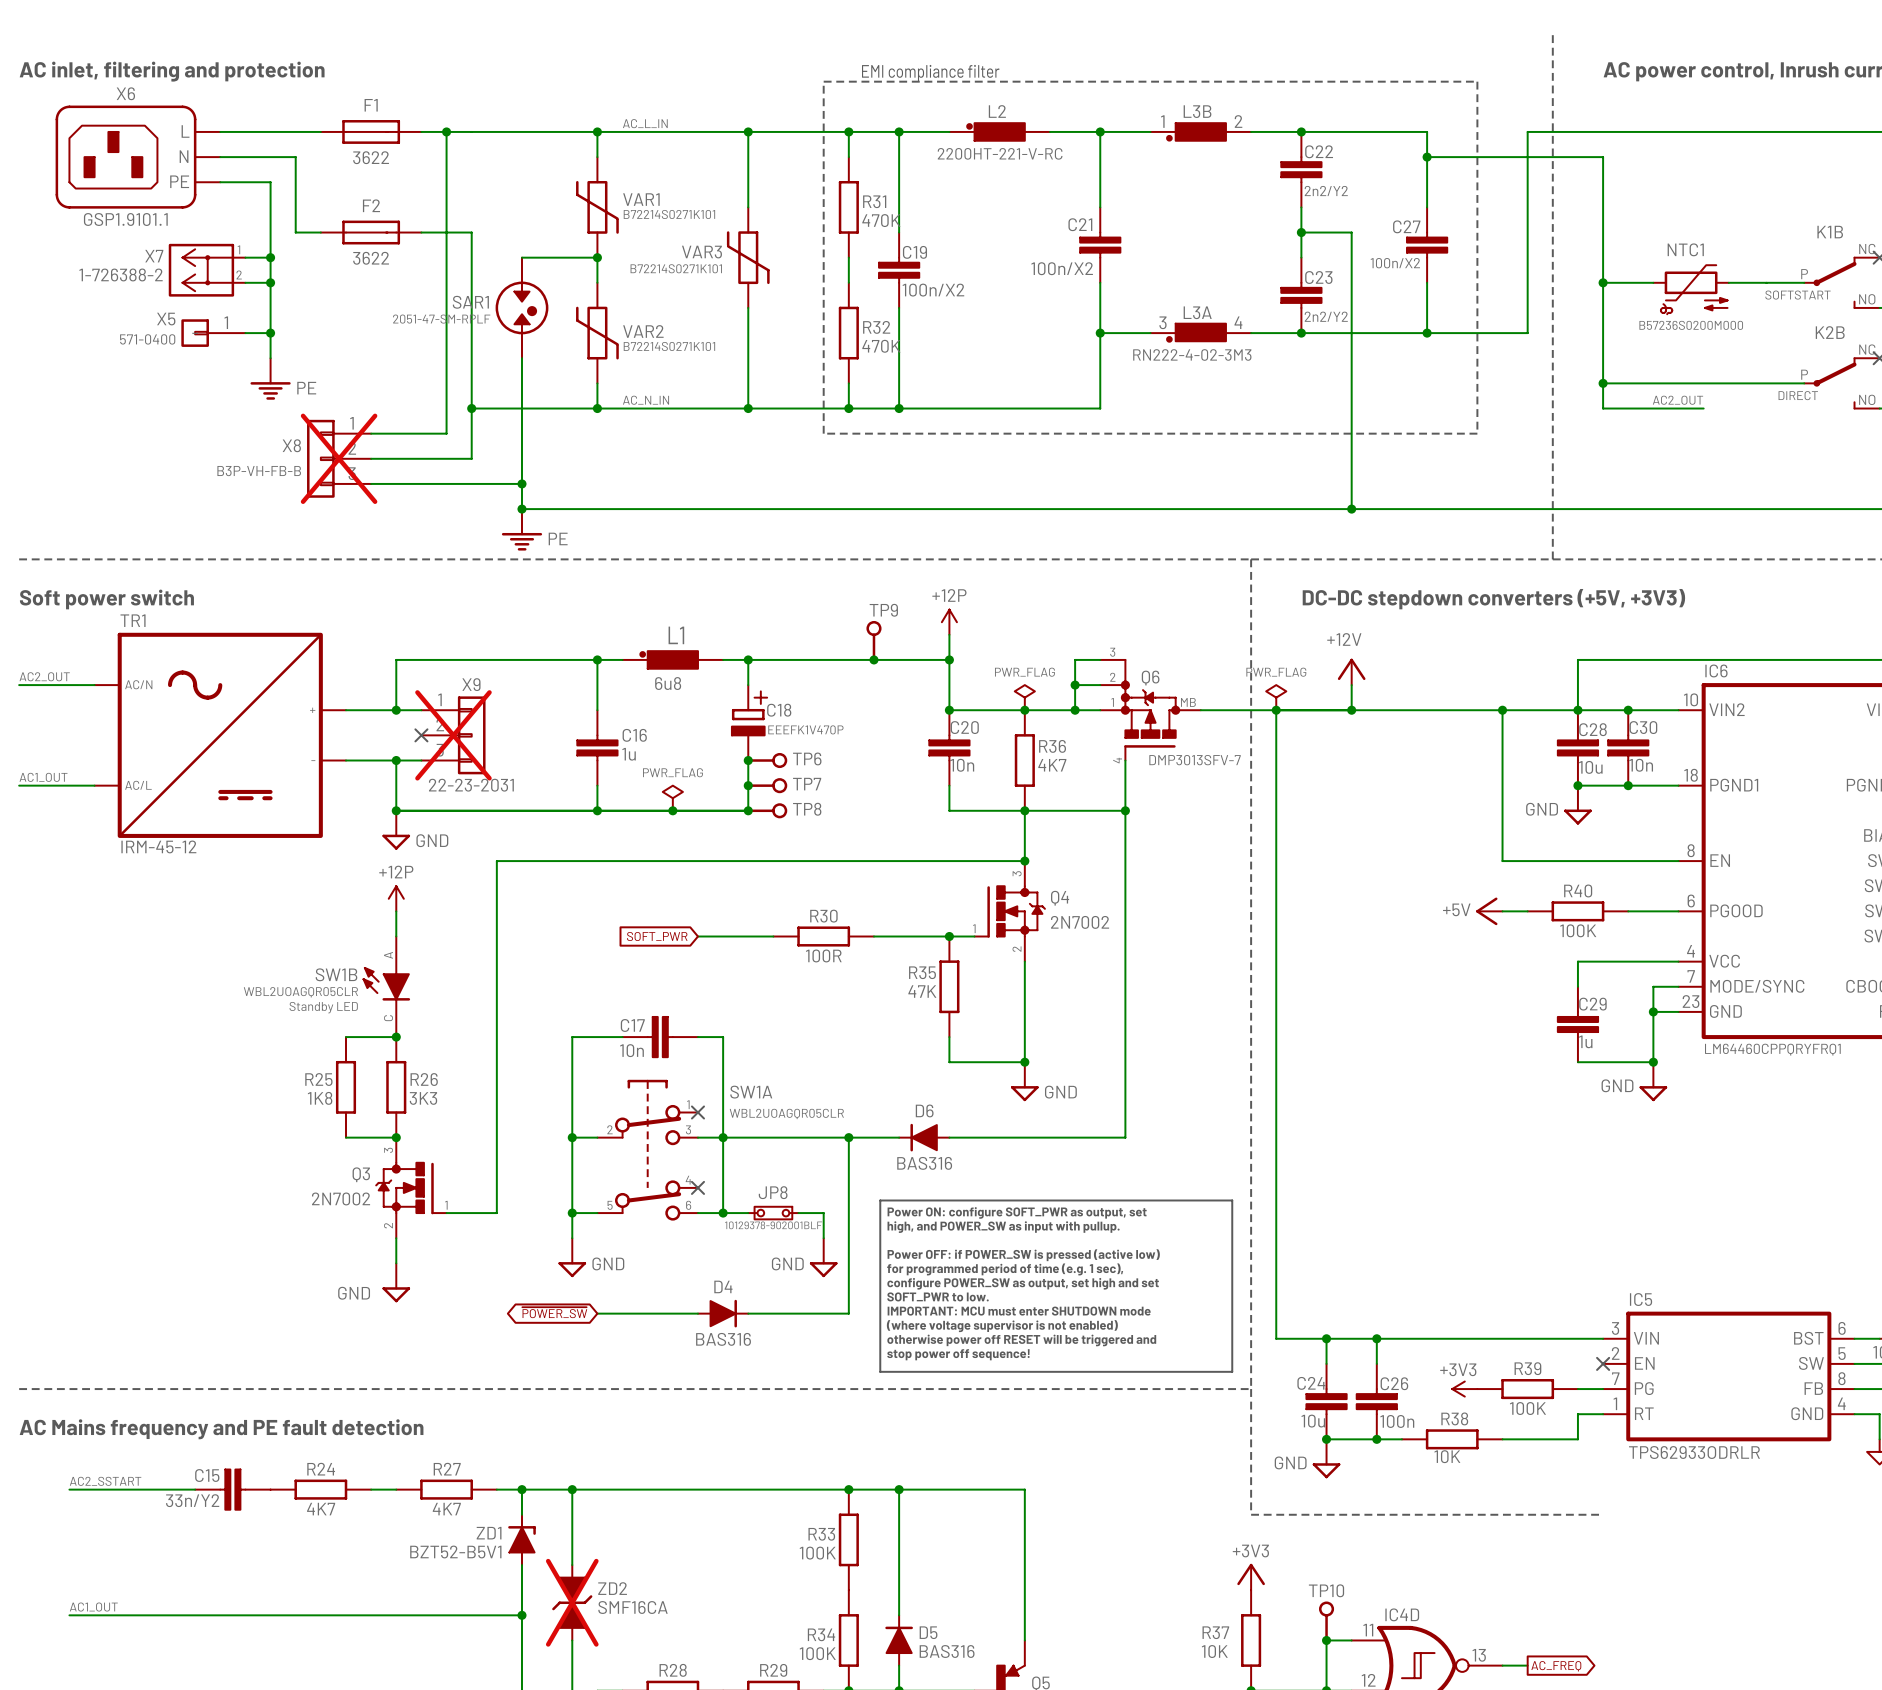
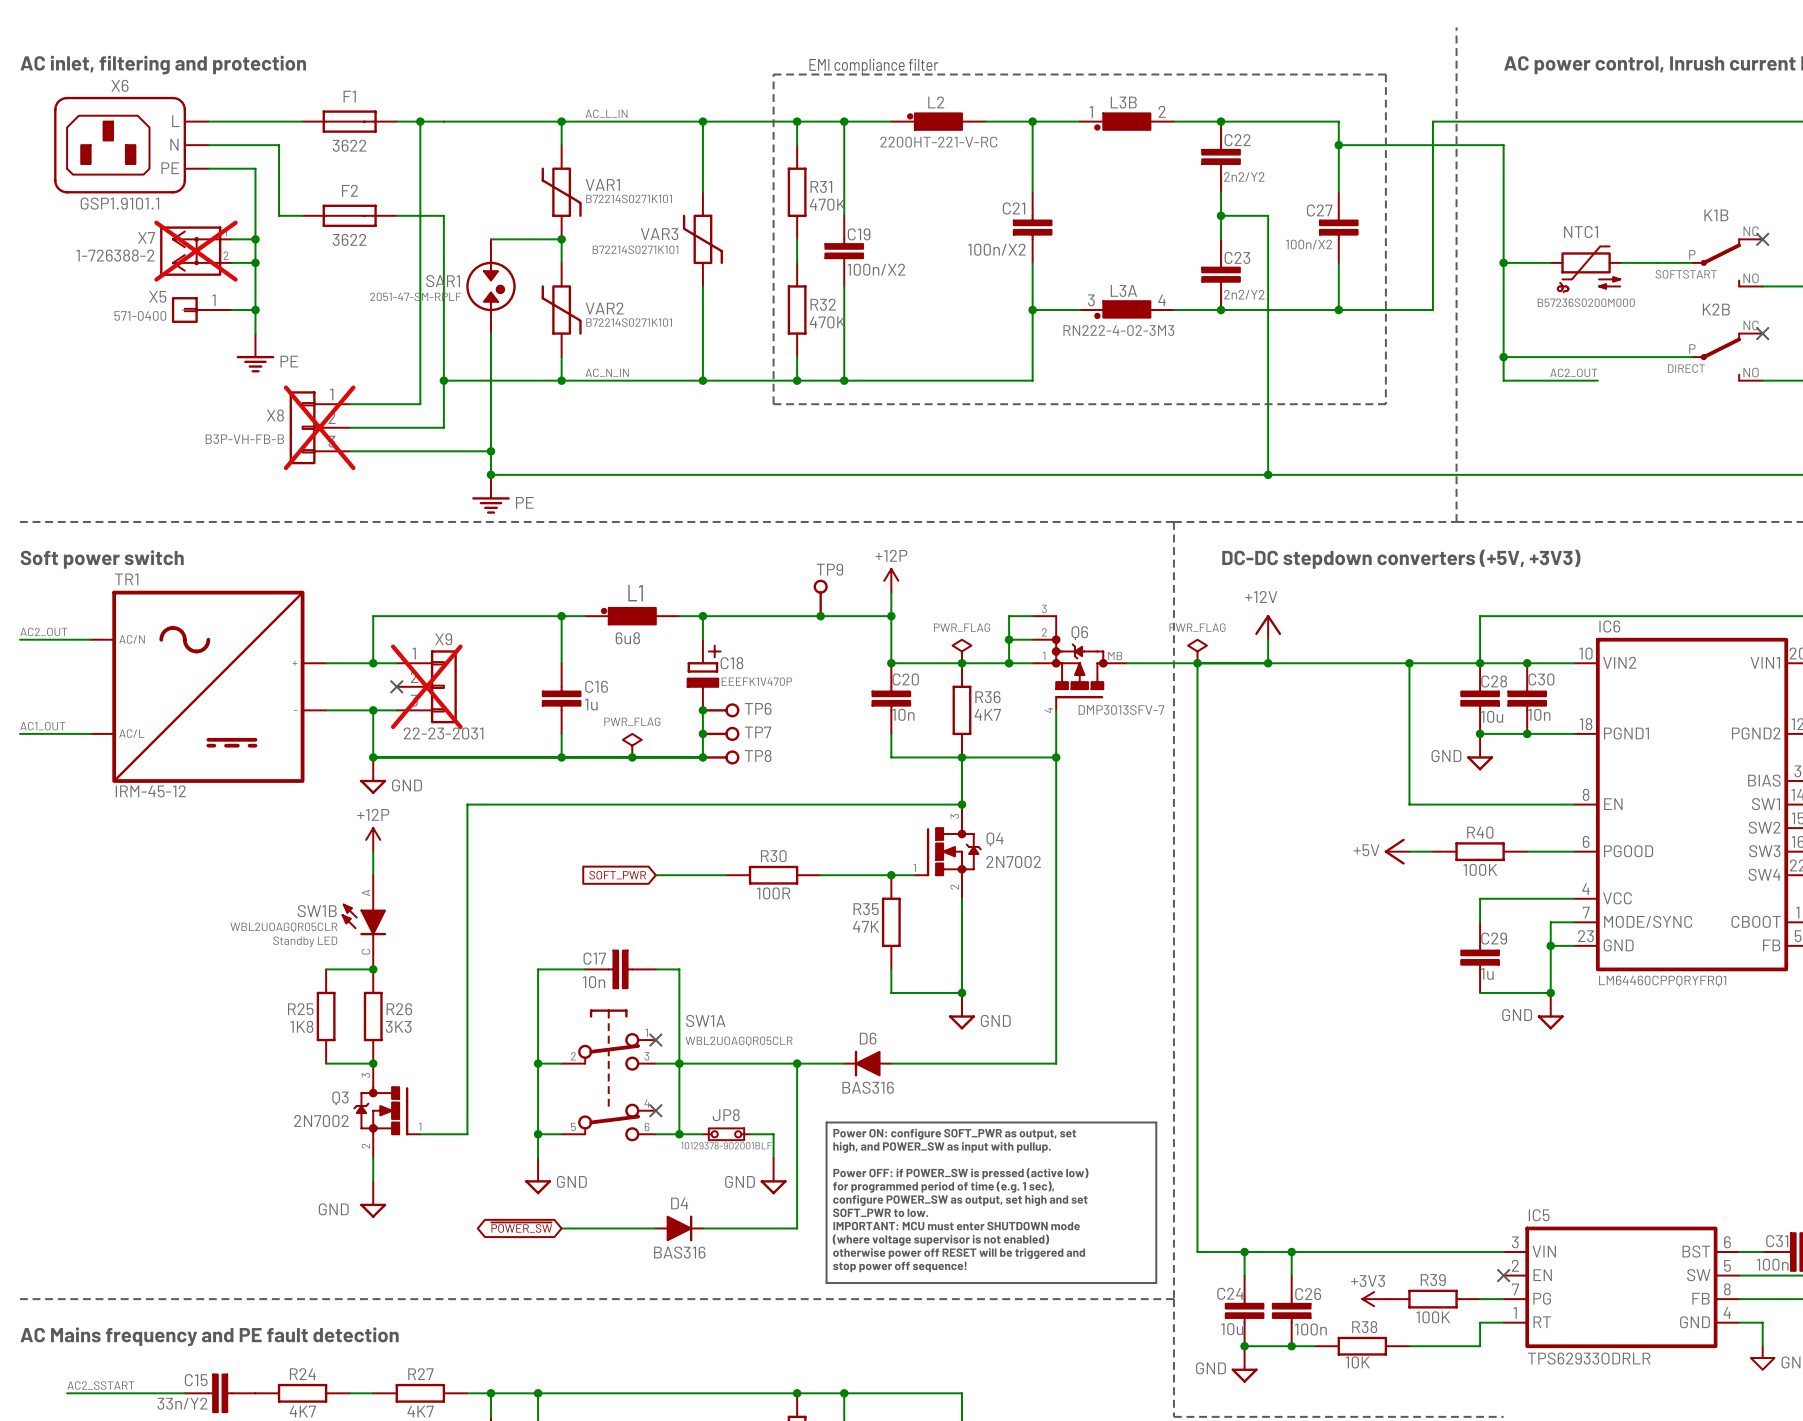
X7 do-not-place cross: none -> (196, 251)

